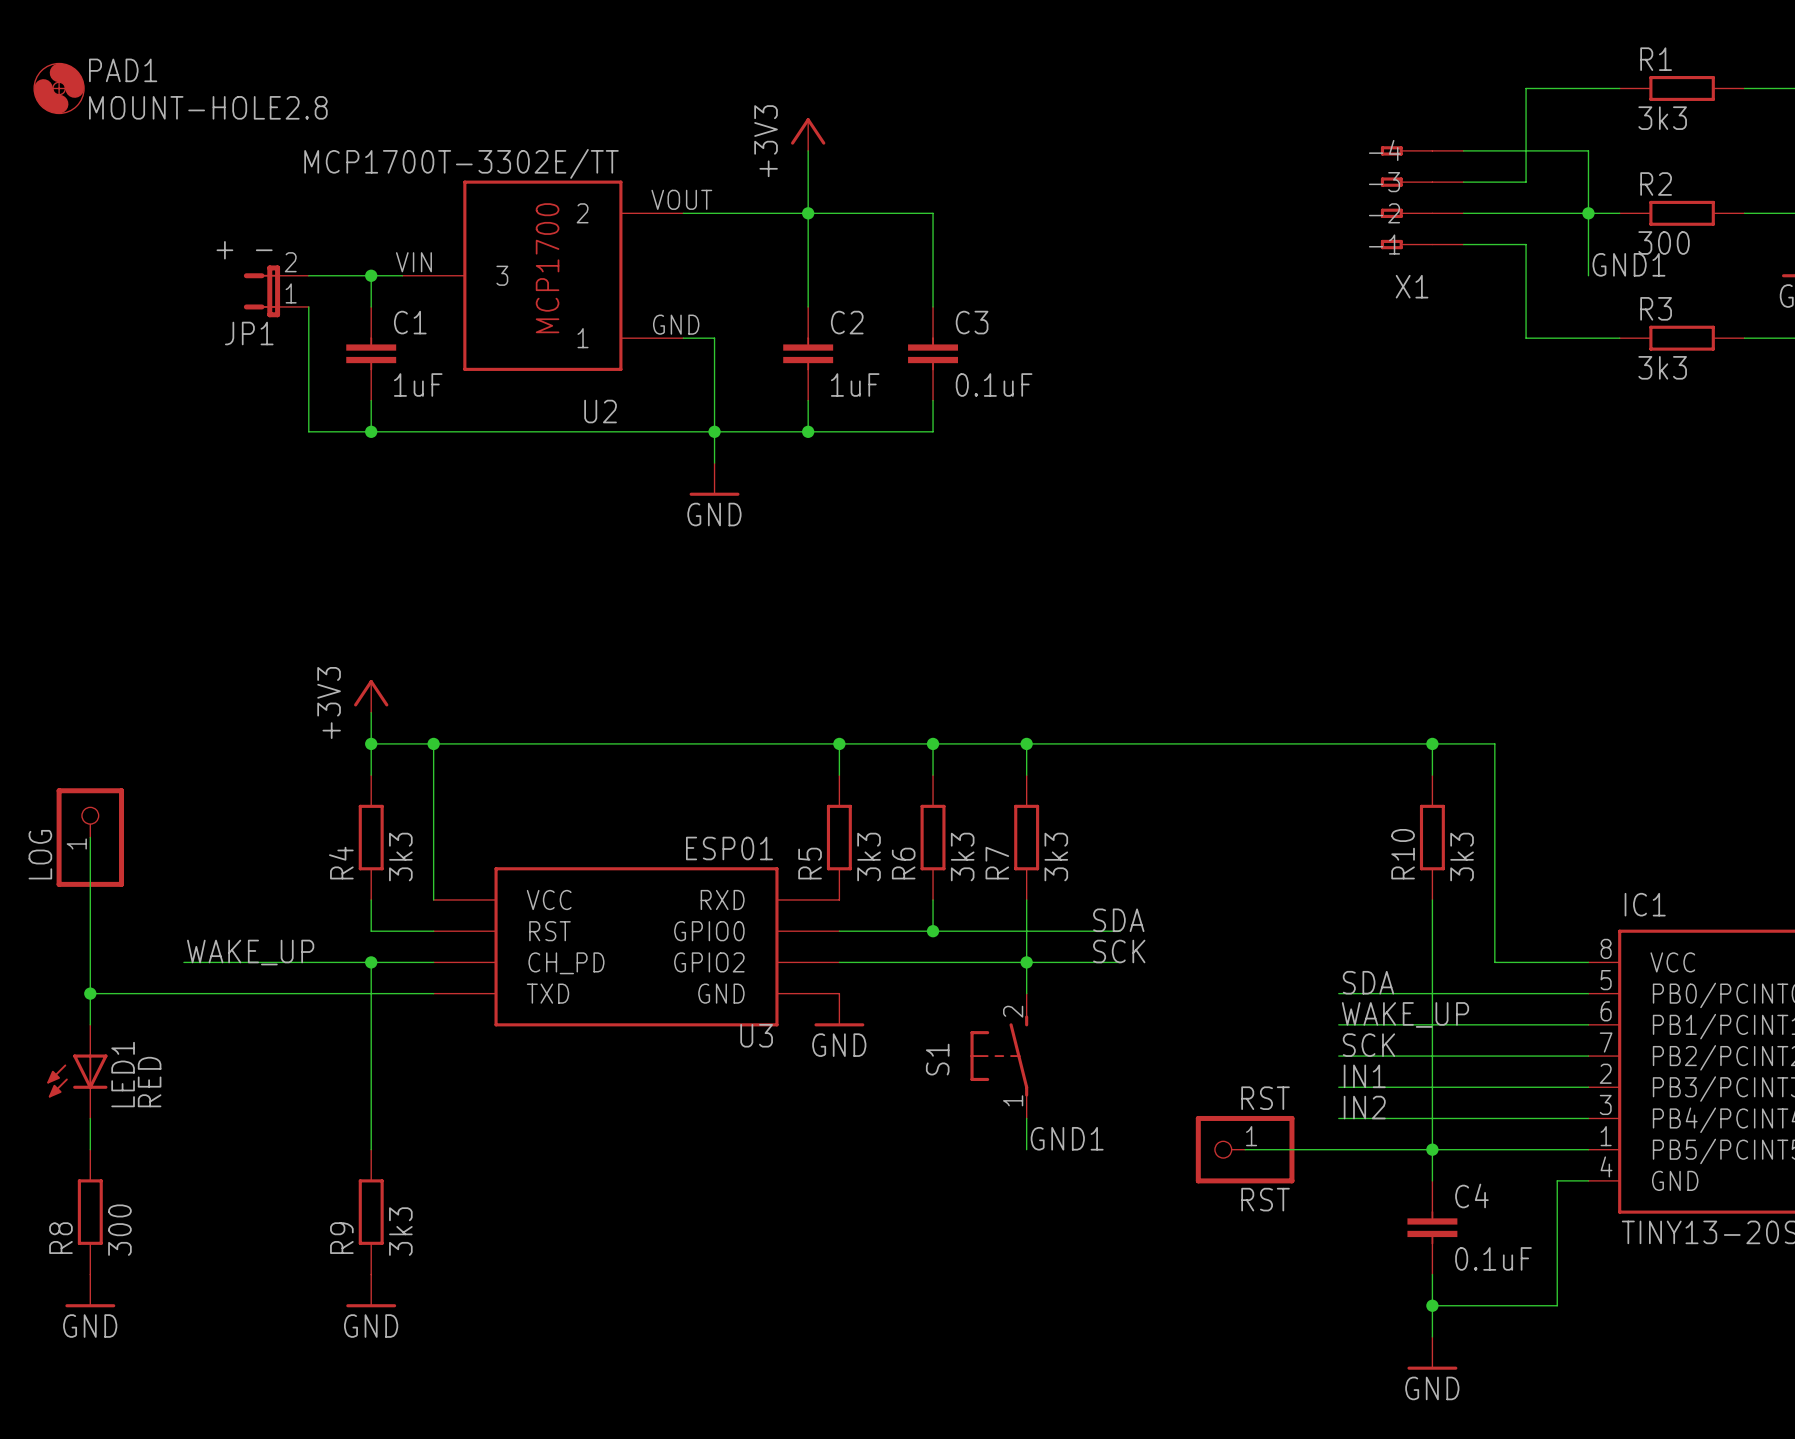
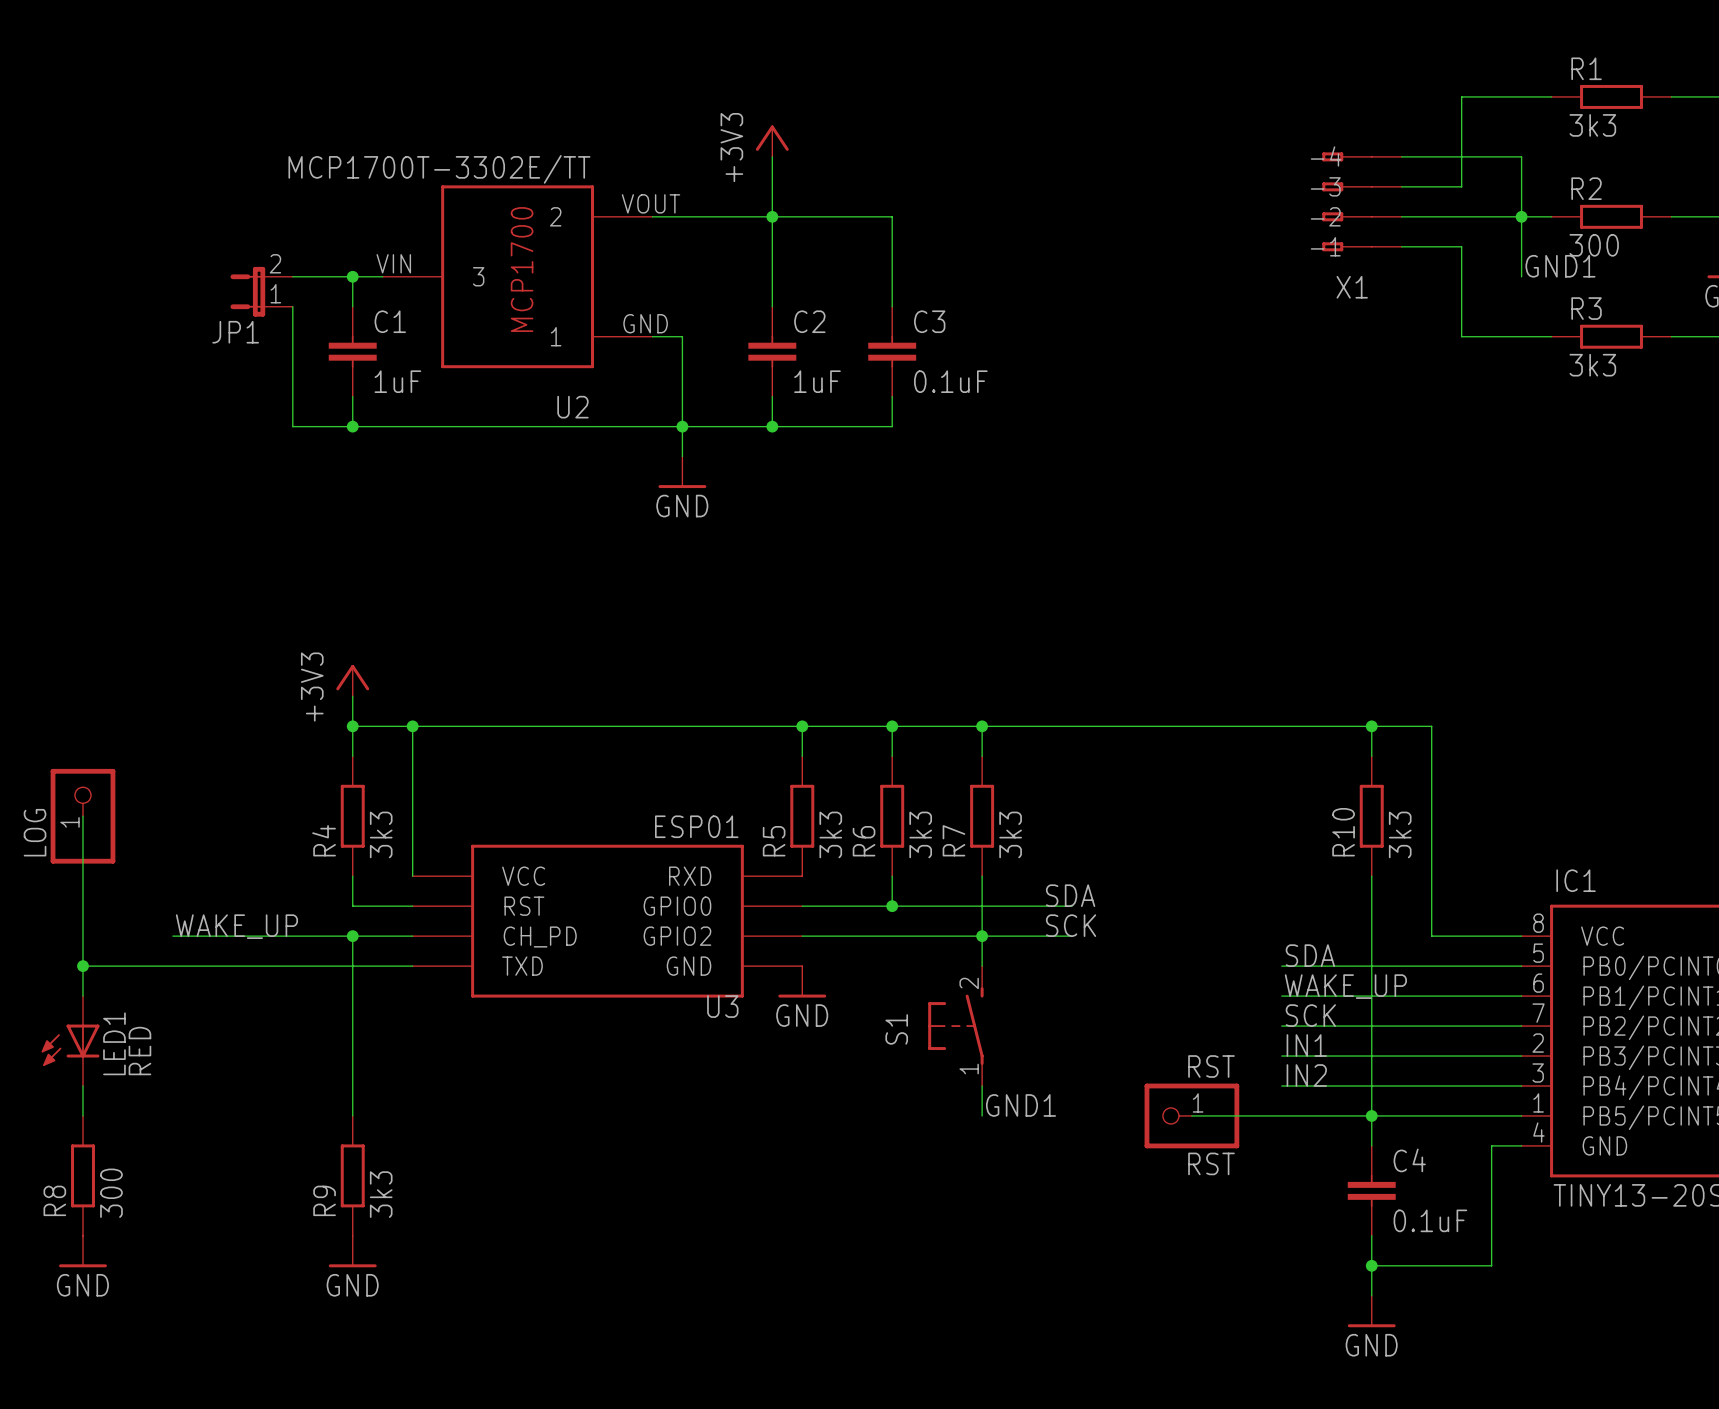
PAD1: MOUNT-HOLE2.8 (59, 88) -> none
JP1 value: + - (244, 250) -> none

